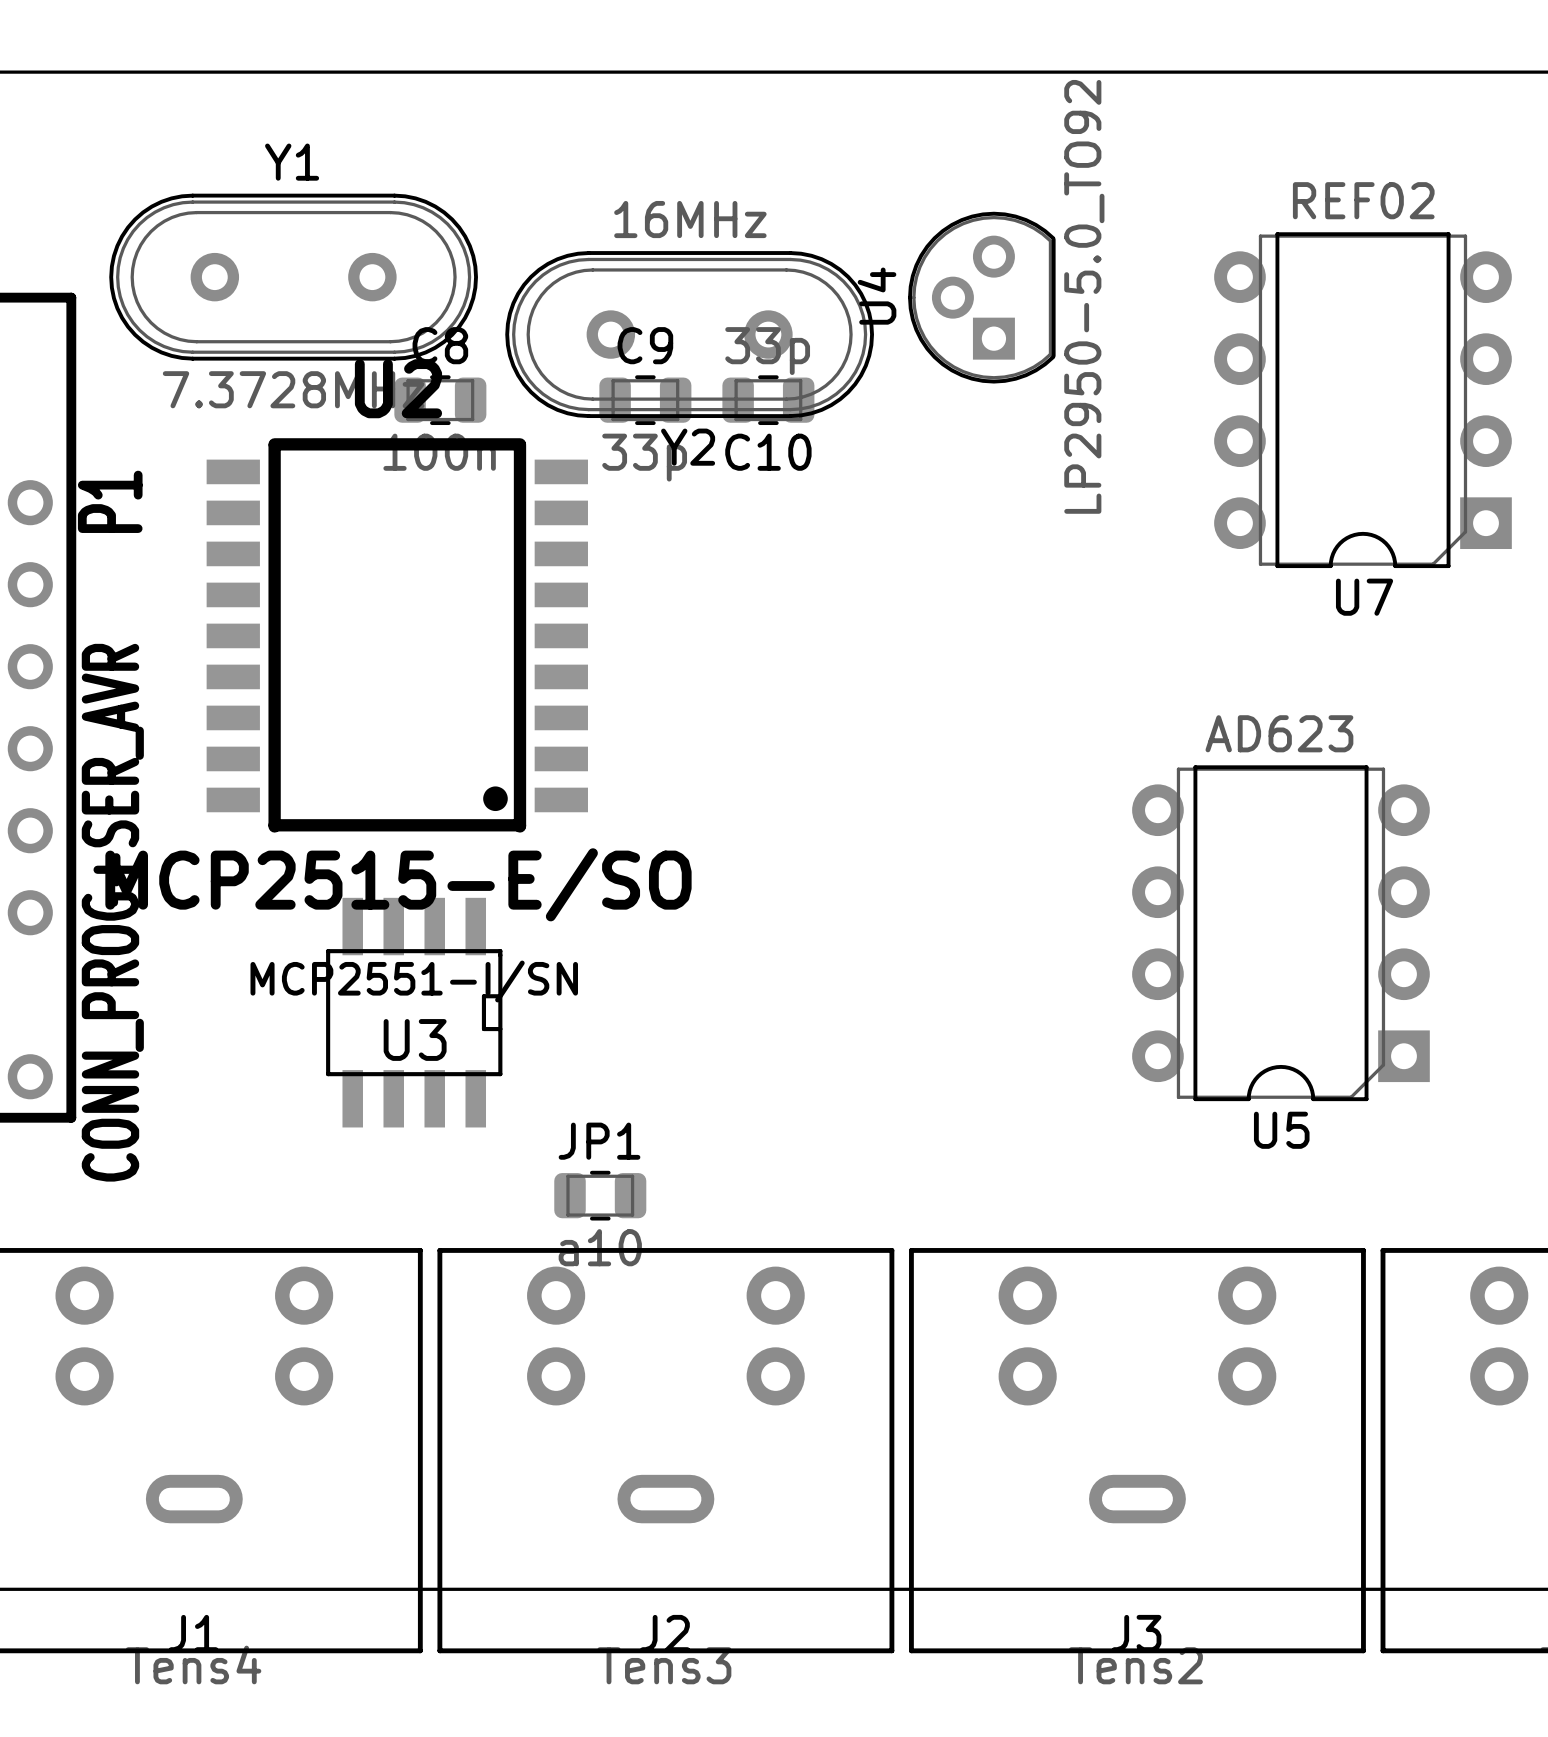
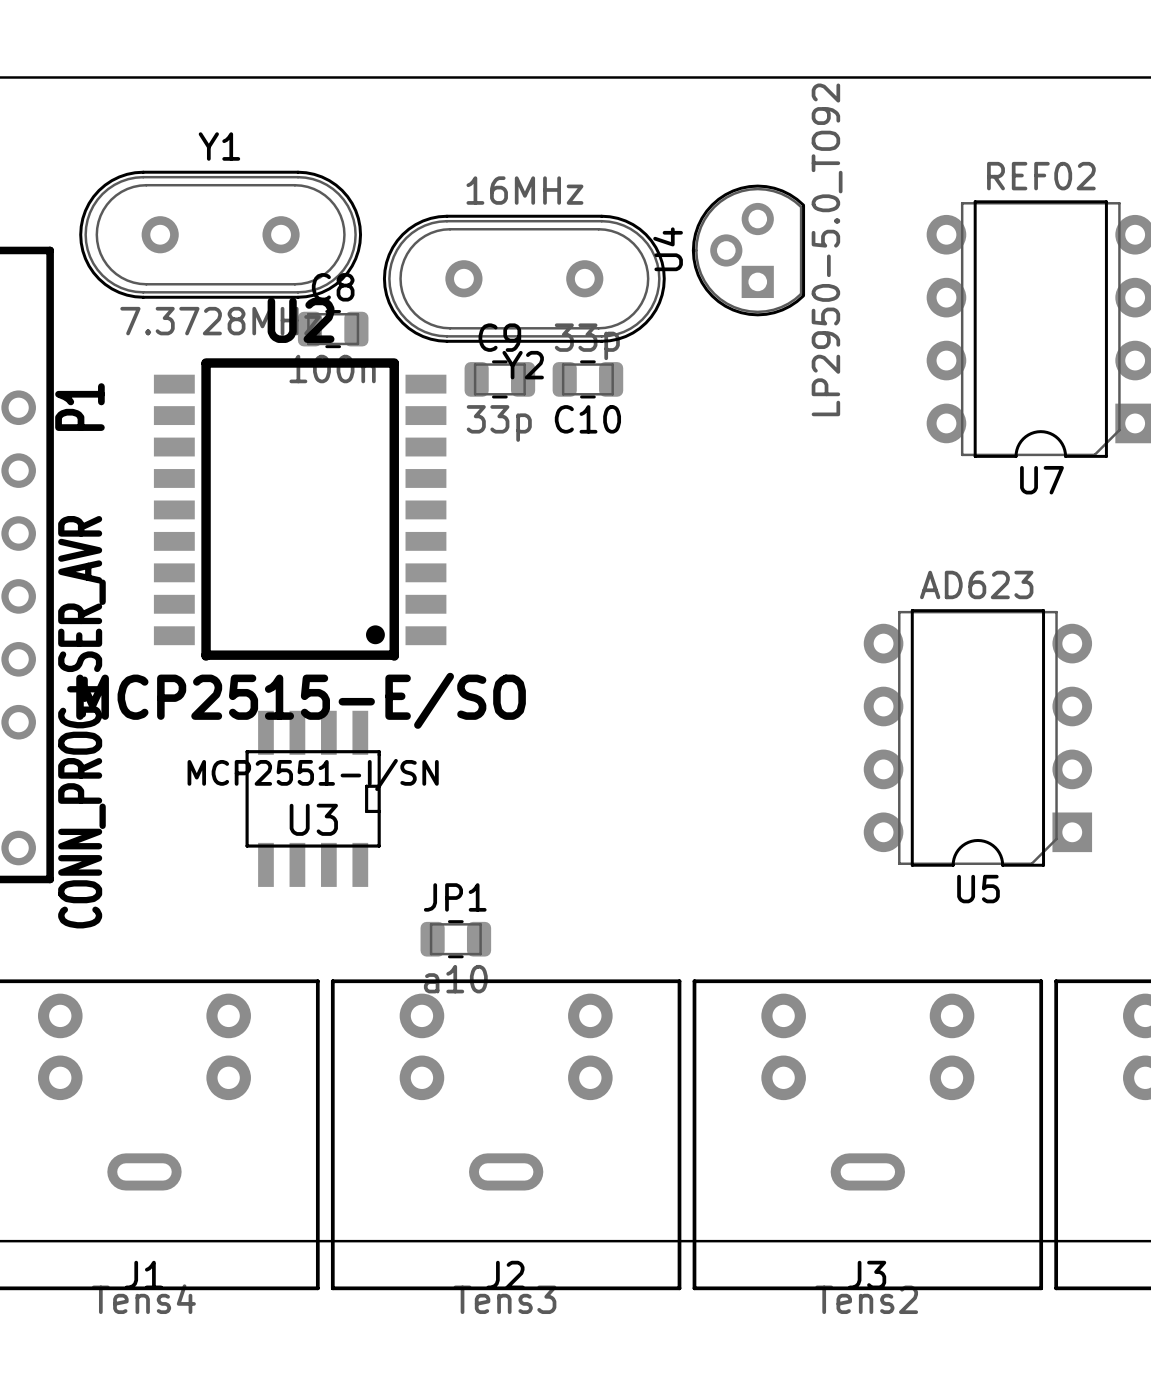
C9 position: (645, 400) -> (499, 379)
C10 position: (768, 400) -> (587, 379)

